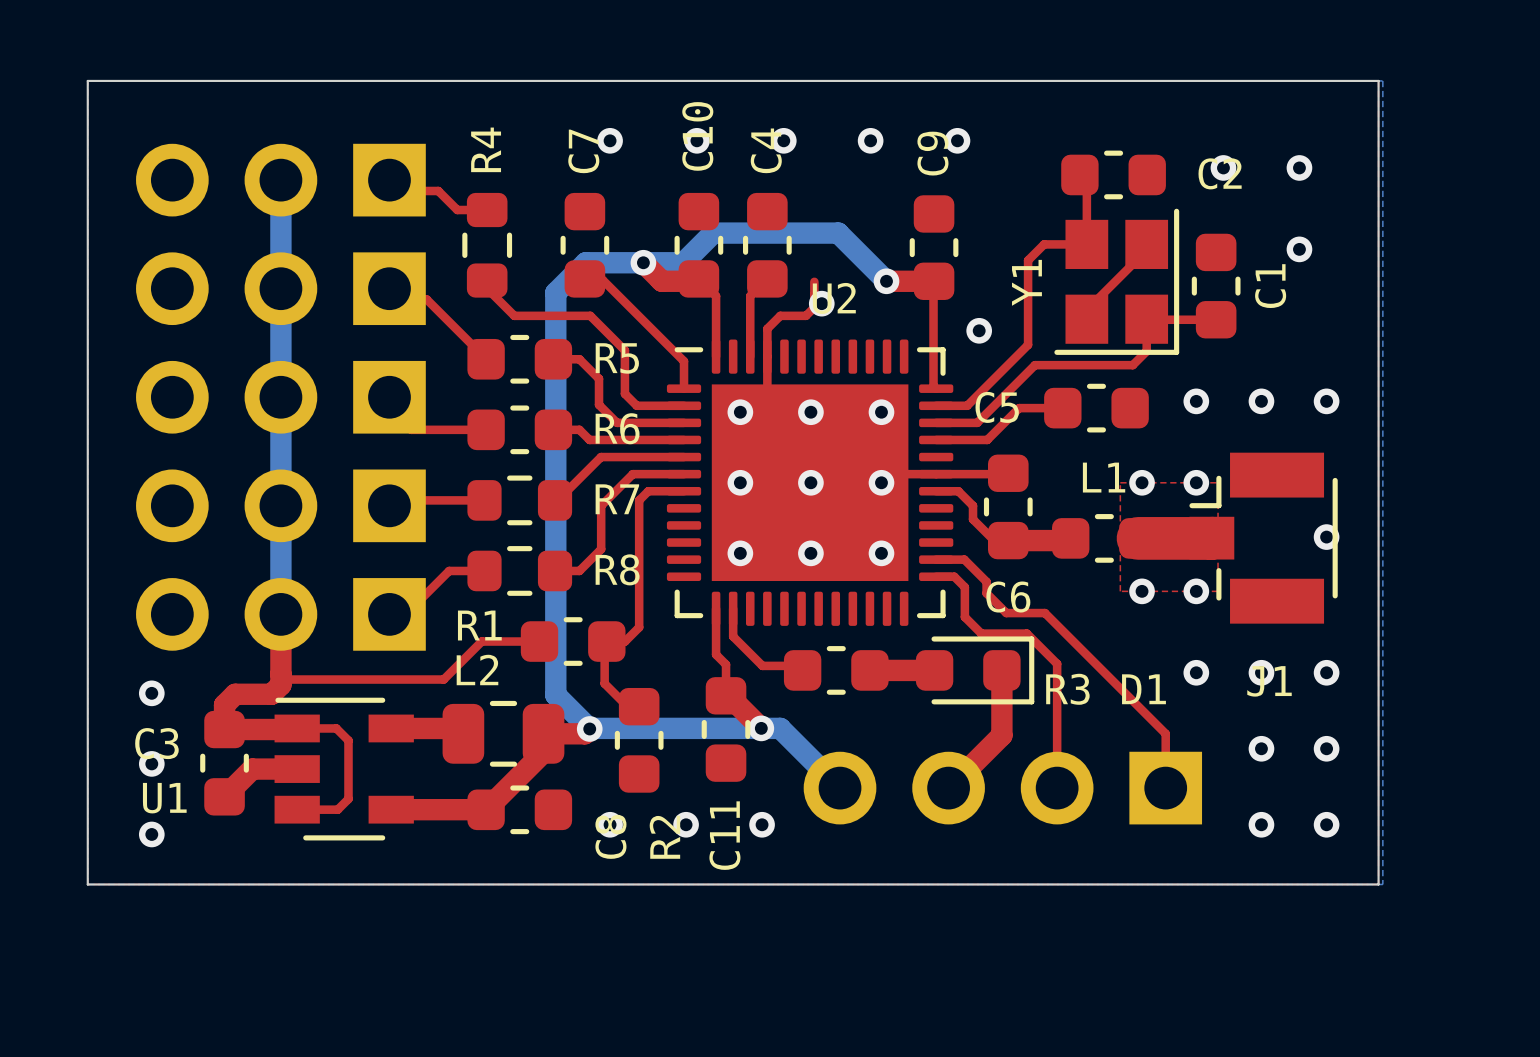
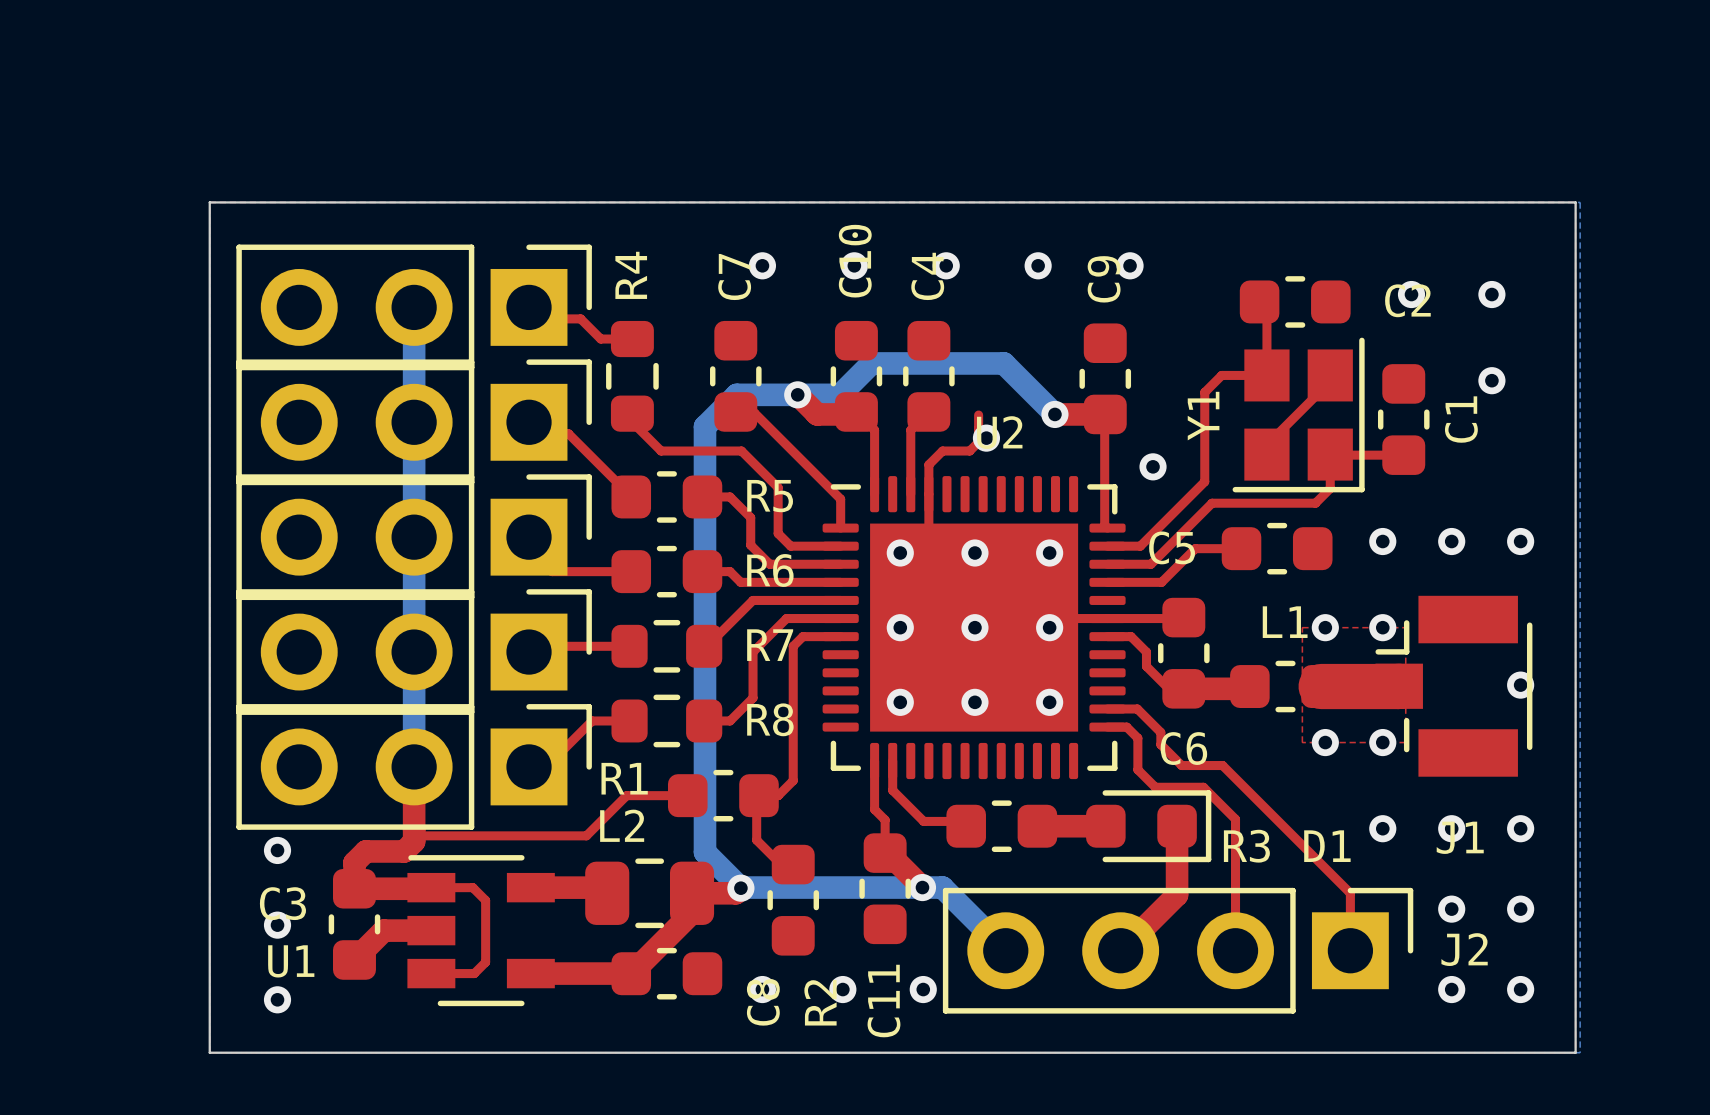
part side: bottom (280, 180) -> top (414, 307)
part side: bottom (280, 288) -> top (414, 422)
part side: bottom (280, 397) -> top (414, 537)
part side: bottom (280, 505) -> top (414, 652)
part side: bottom (280, 614) -> top (414, 766)
J2 side: bottom (1002, 788) -> top (1178, 950)

